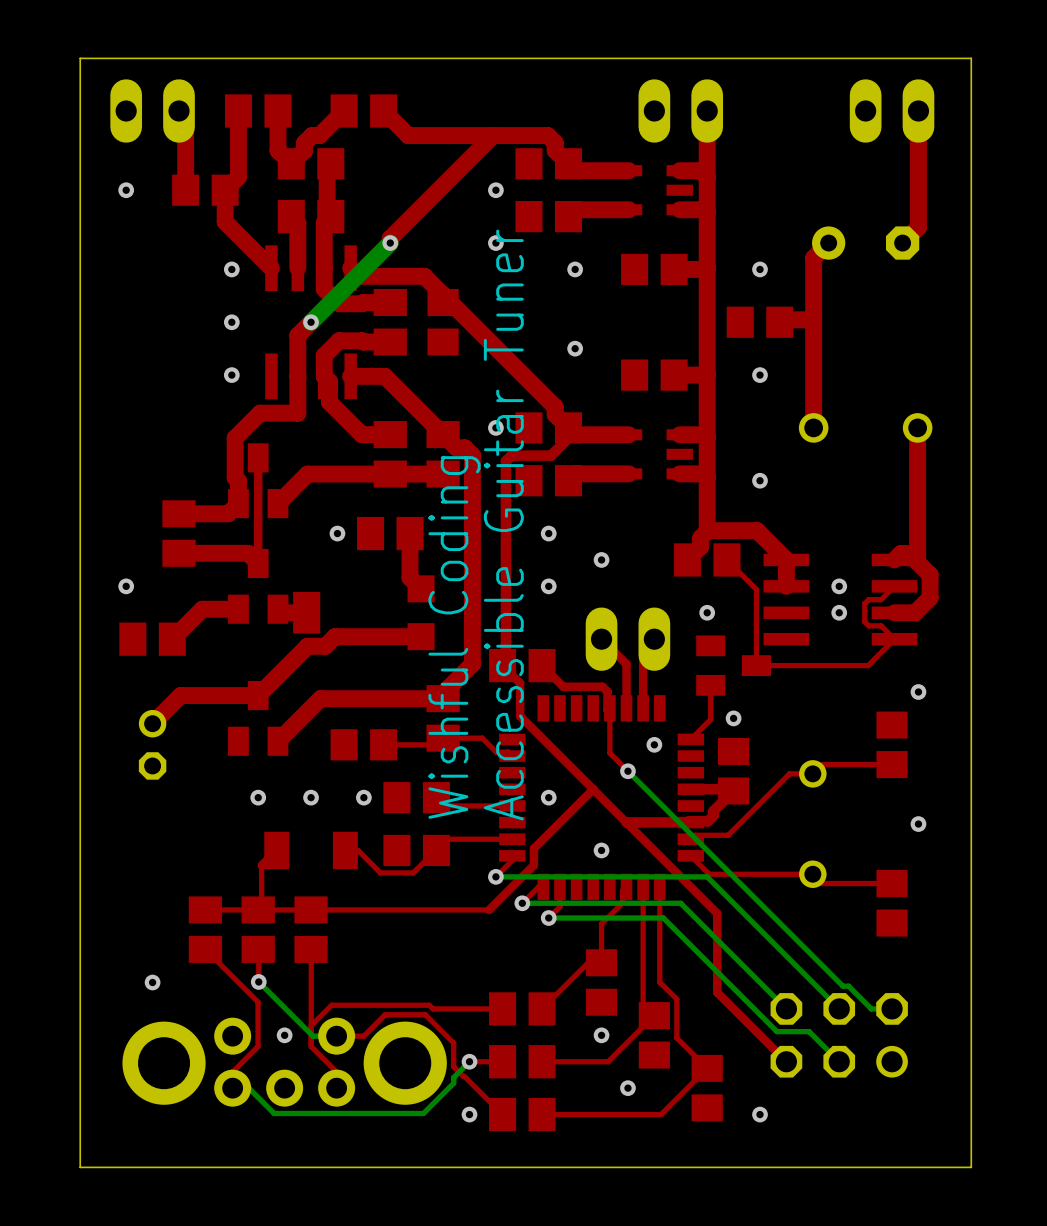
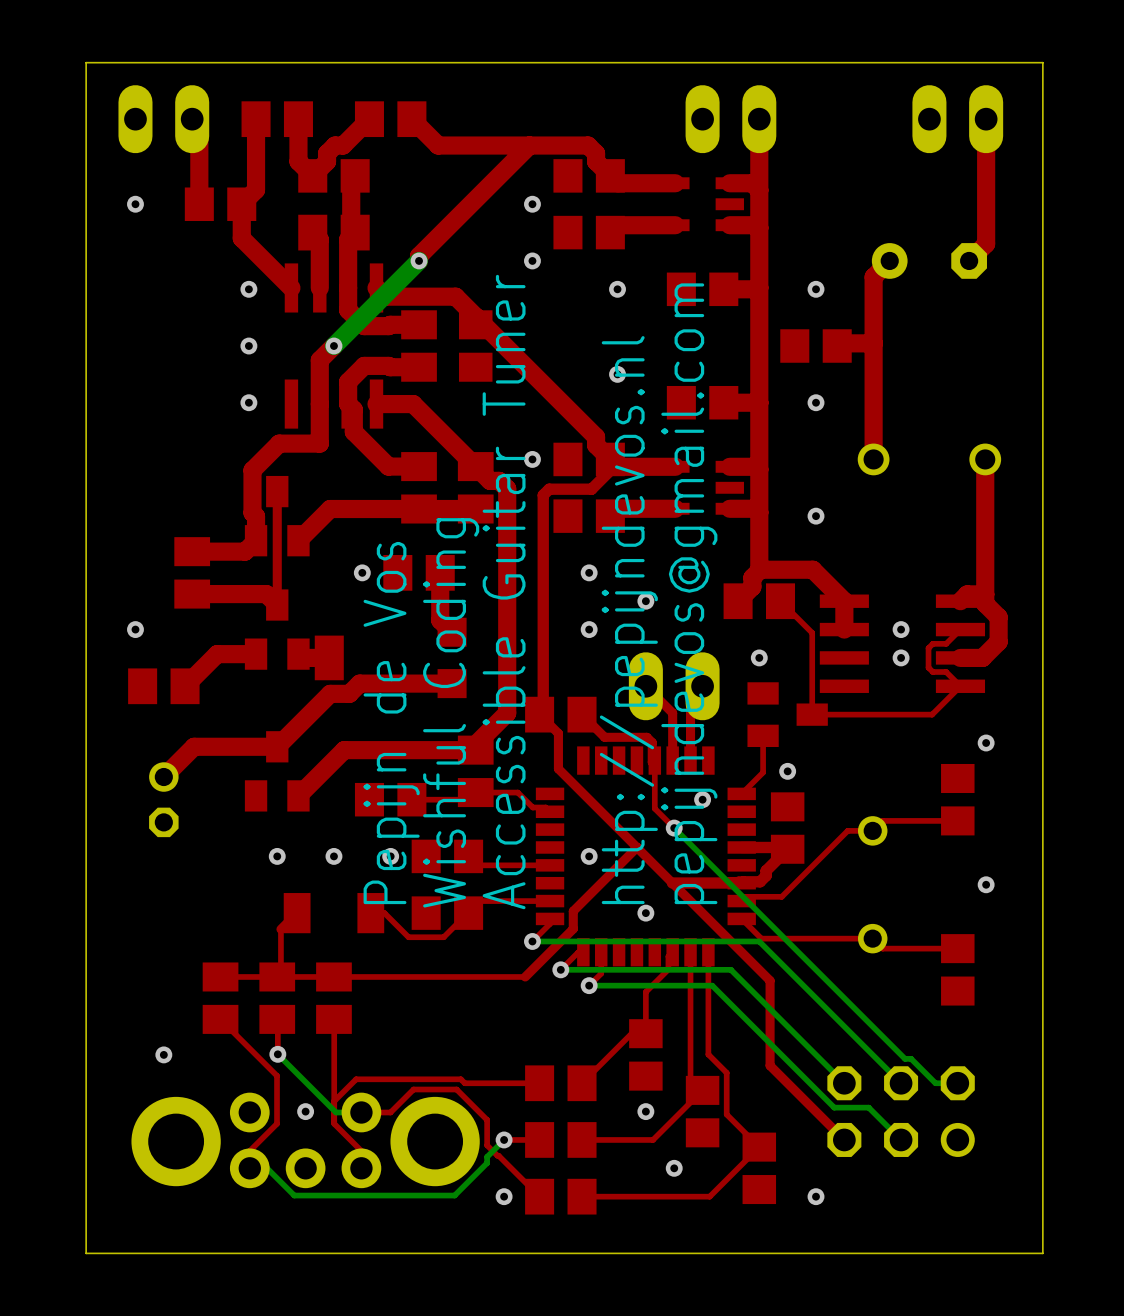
text position: Accessible Guitar Tuner (503, 525) -> Accessible Guitar Tuner (504, 592)
text: none -> pepijndevos@gmail.com (689, 593)
text: none -> http://pepijndevos.nl (628, 620)
text position: Wishful Coding (454, 637) -> Wishful Coding (451, 712)
text: none -> Pepijn de Vos (391, 723)

